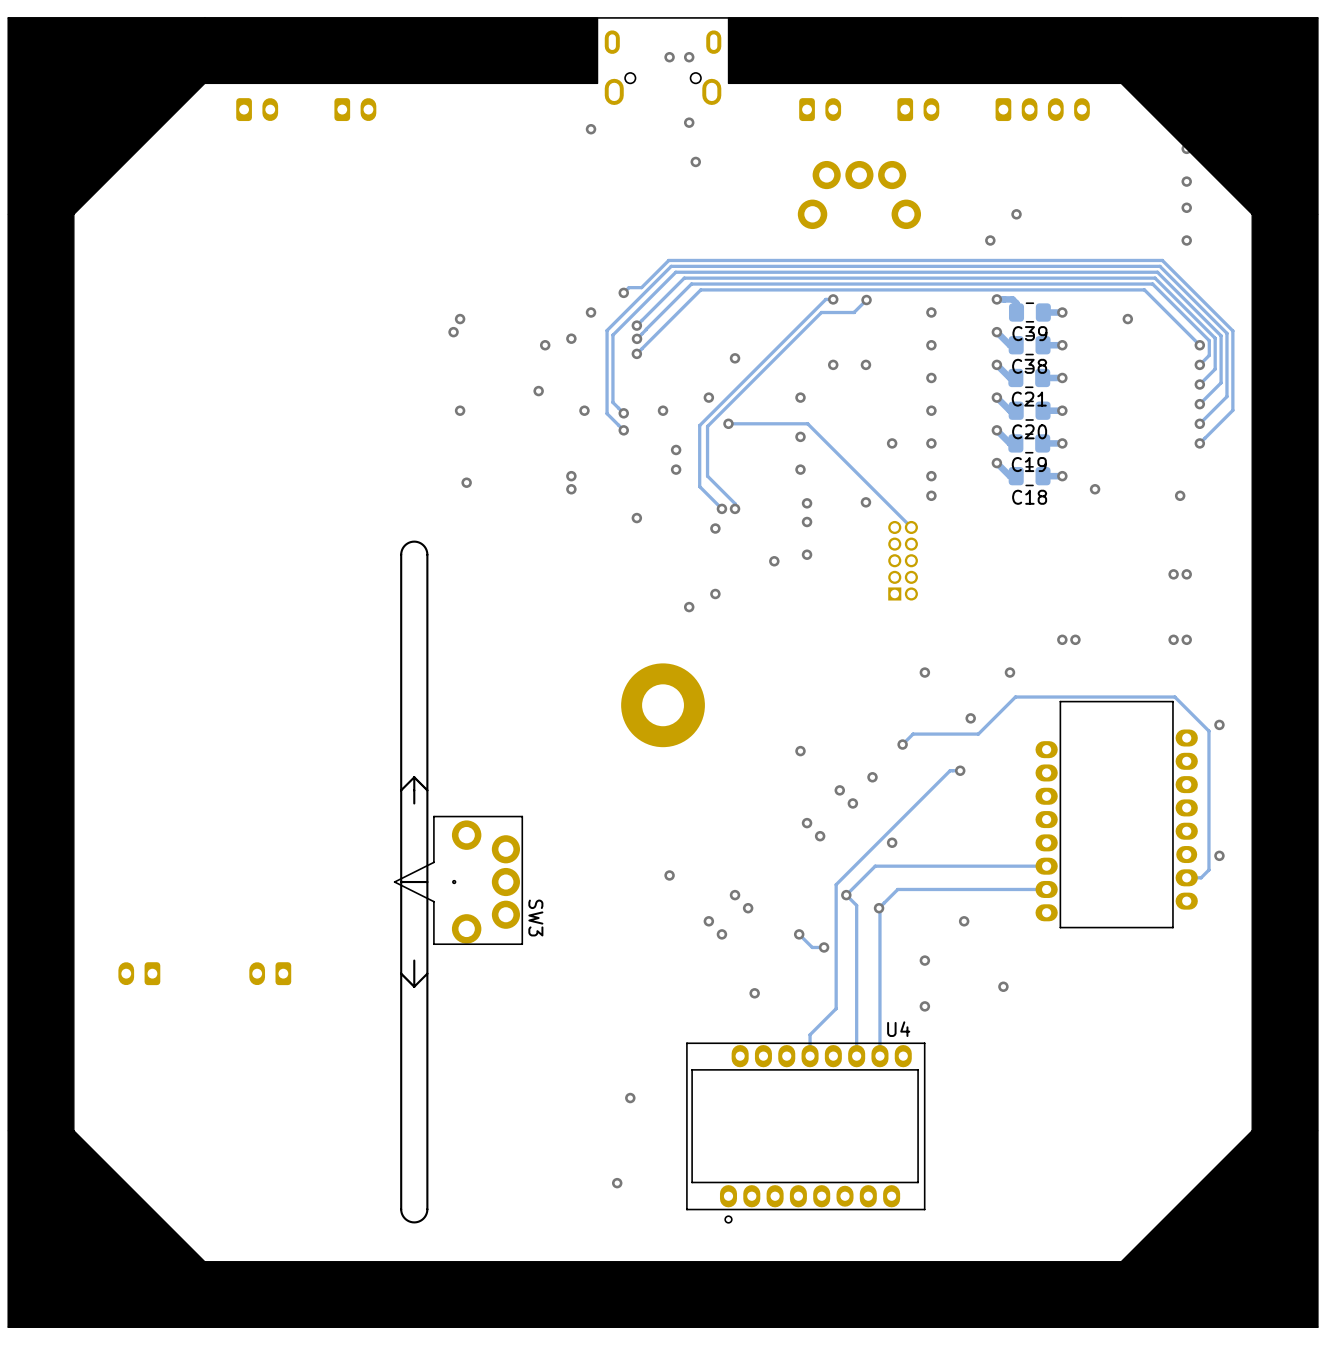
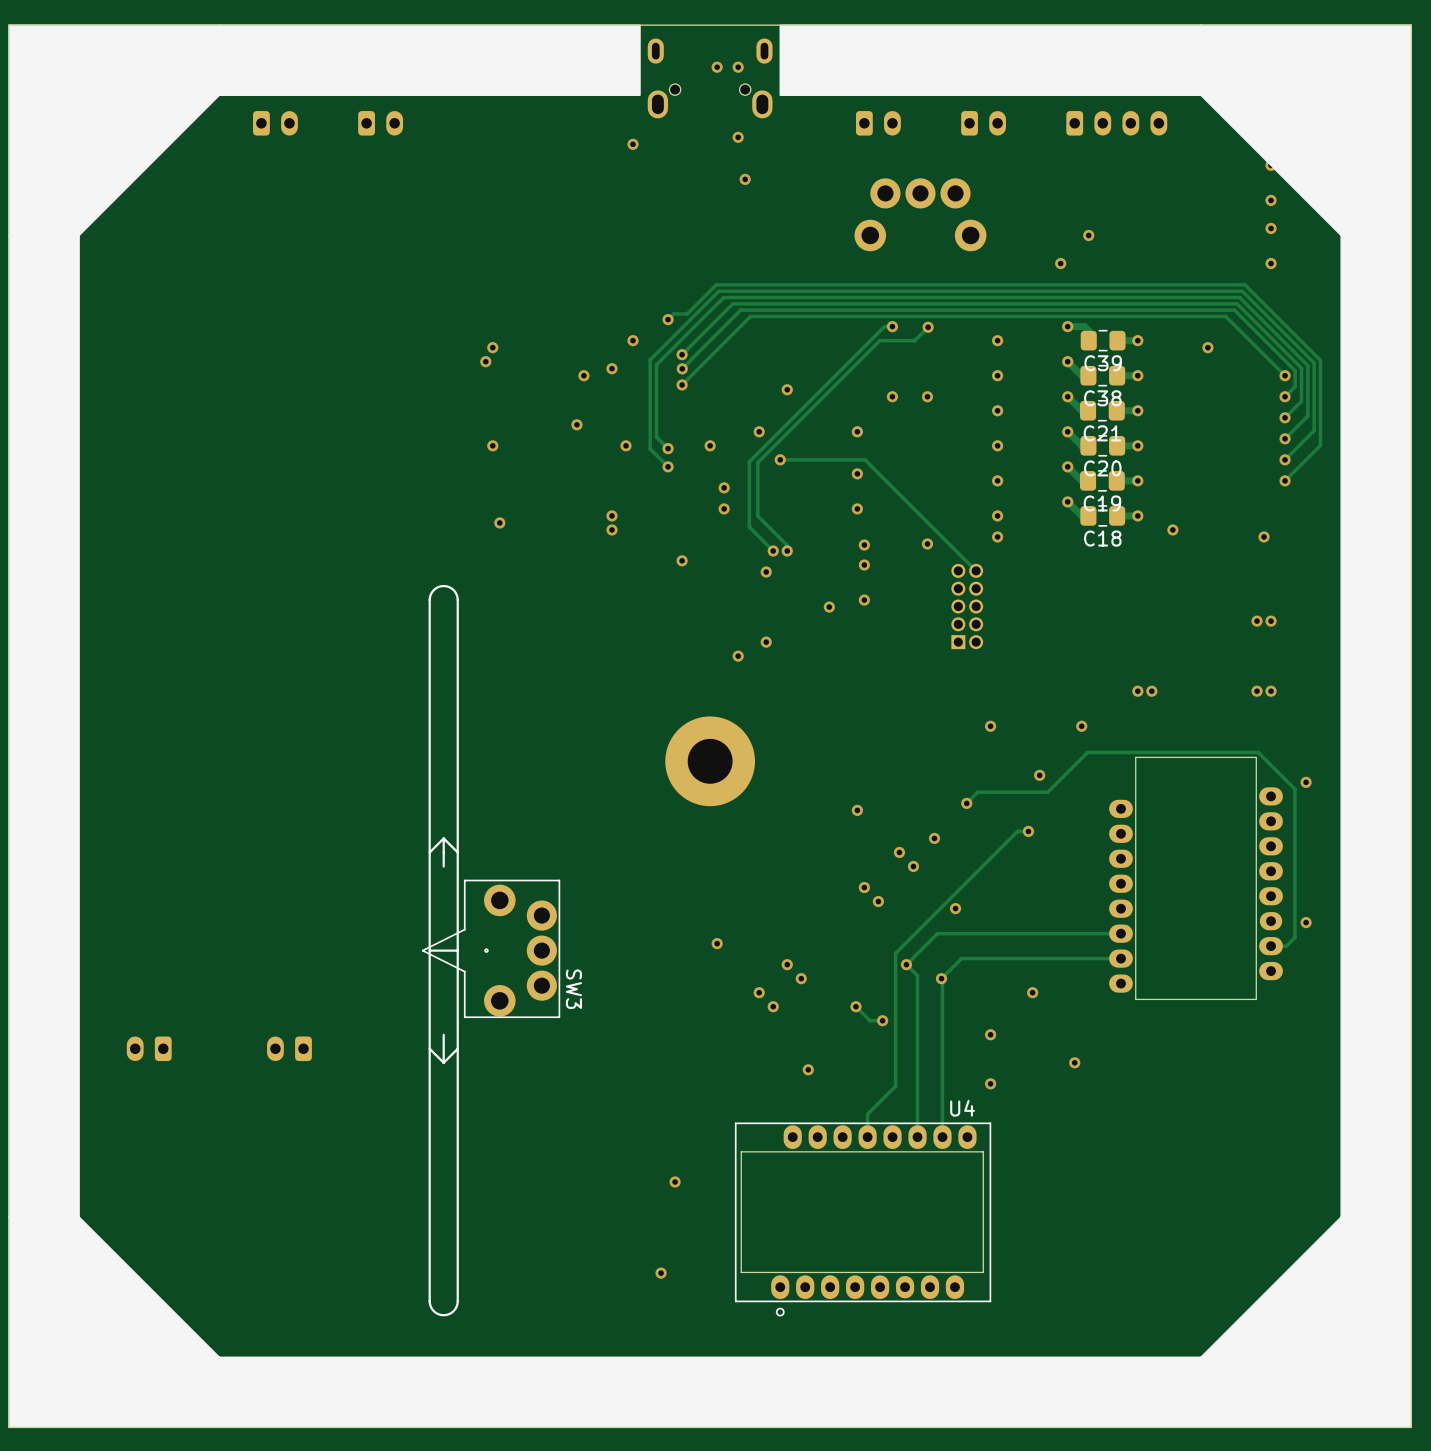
via: (892, 443) -> none

